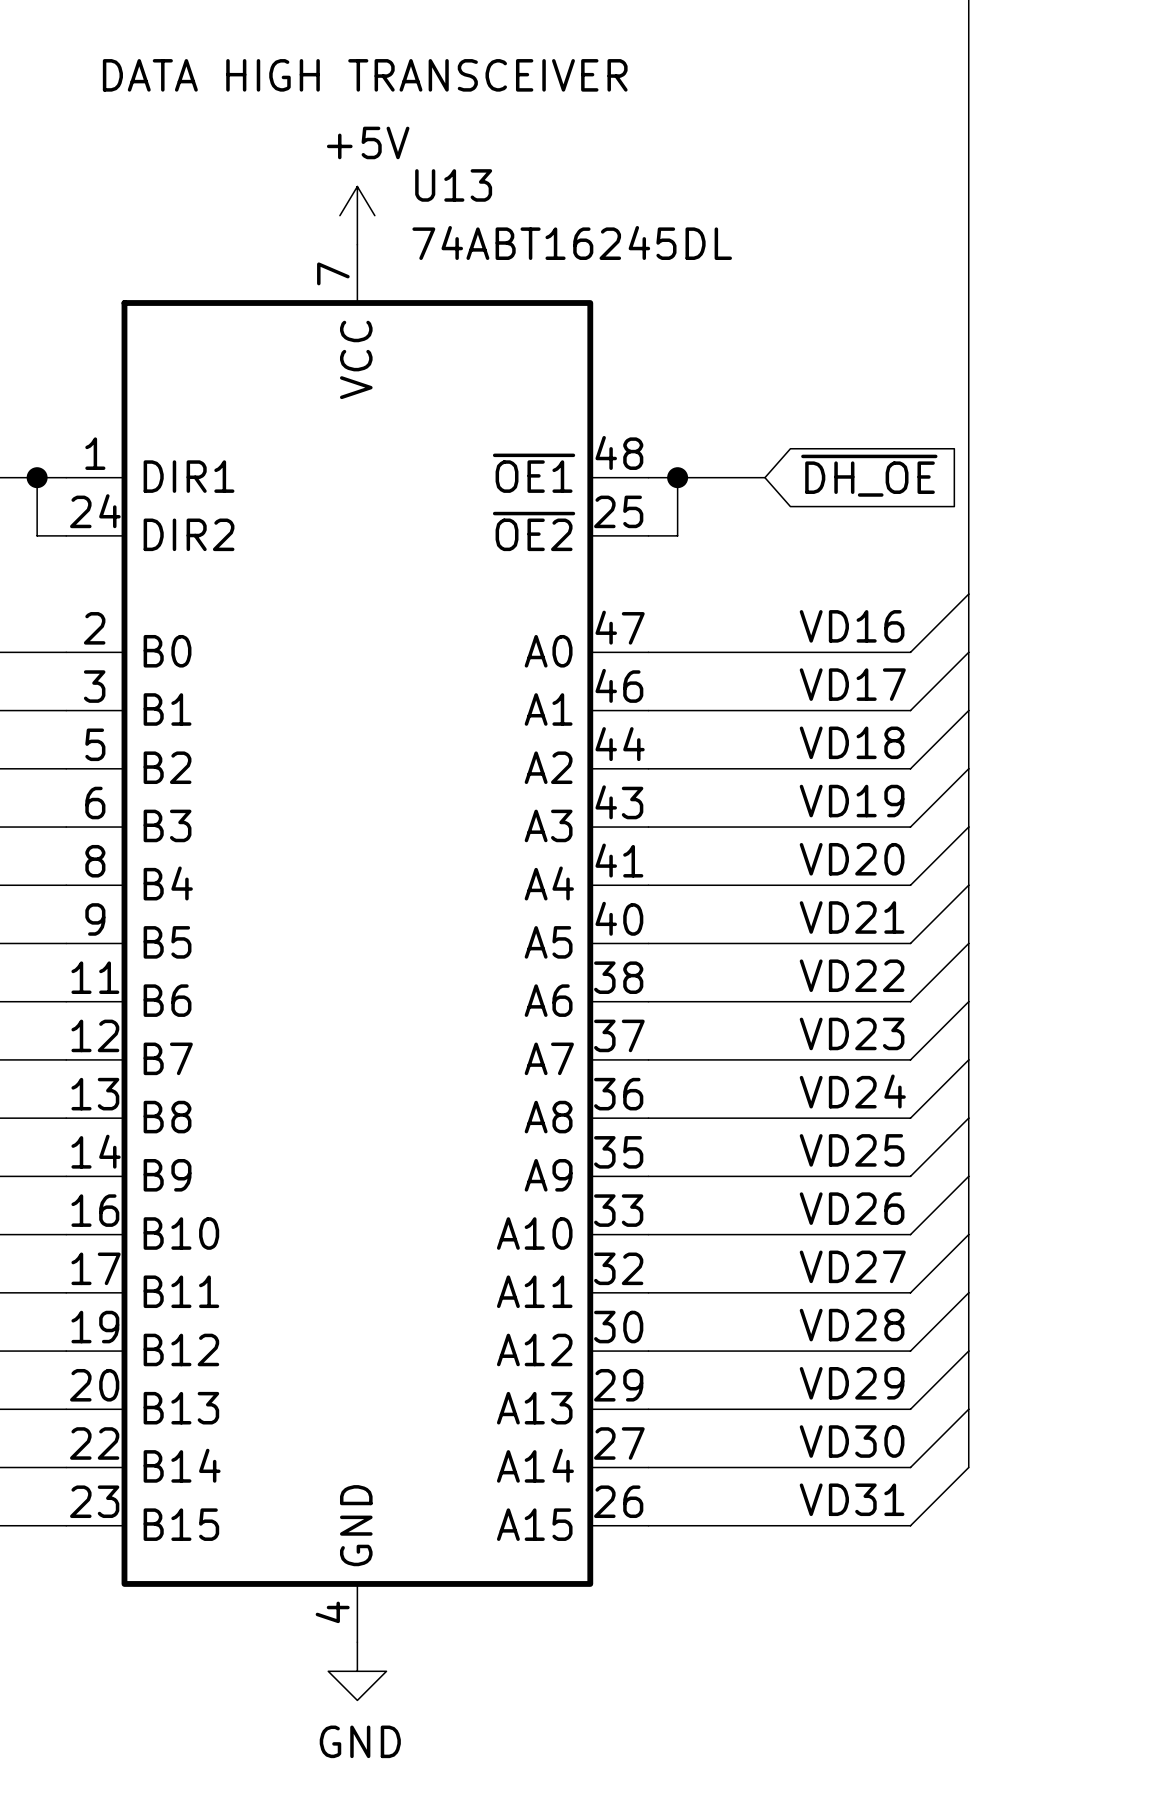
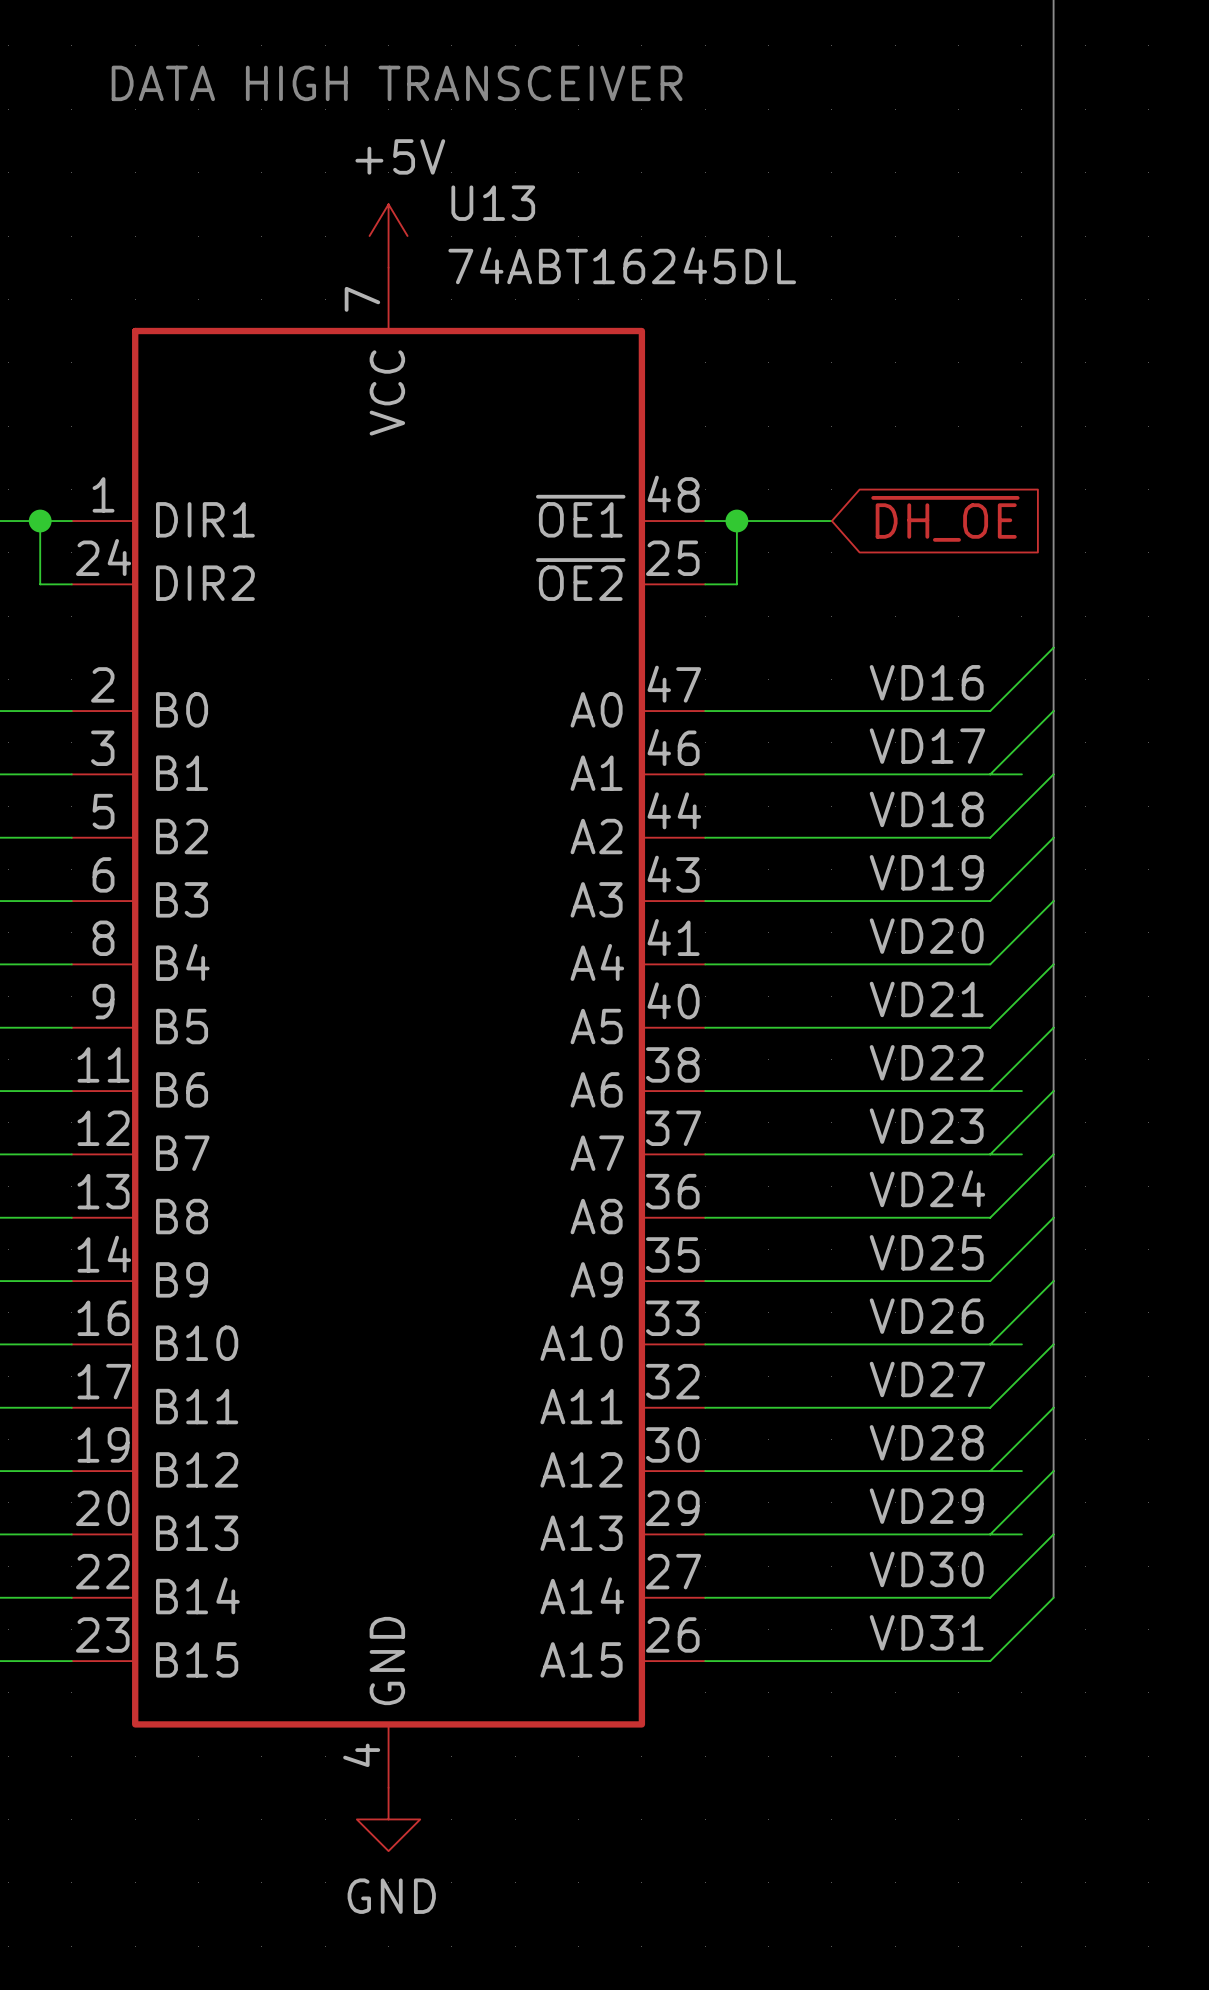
wire: none -> (990, 774) (1021, 774)
wire: none -> (990, 1091) (1021, 1091)
wire: none -> (990, 1154) (1021, 1154)
wire: none -> (990, 1344) (1021, 1344)
wire: none -> (990, 1471) (1021, 1471)
wire: none -> (990, 1534) (1021, 1534)

